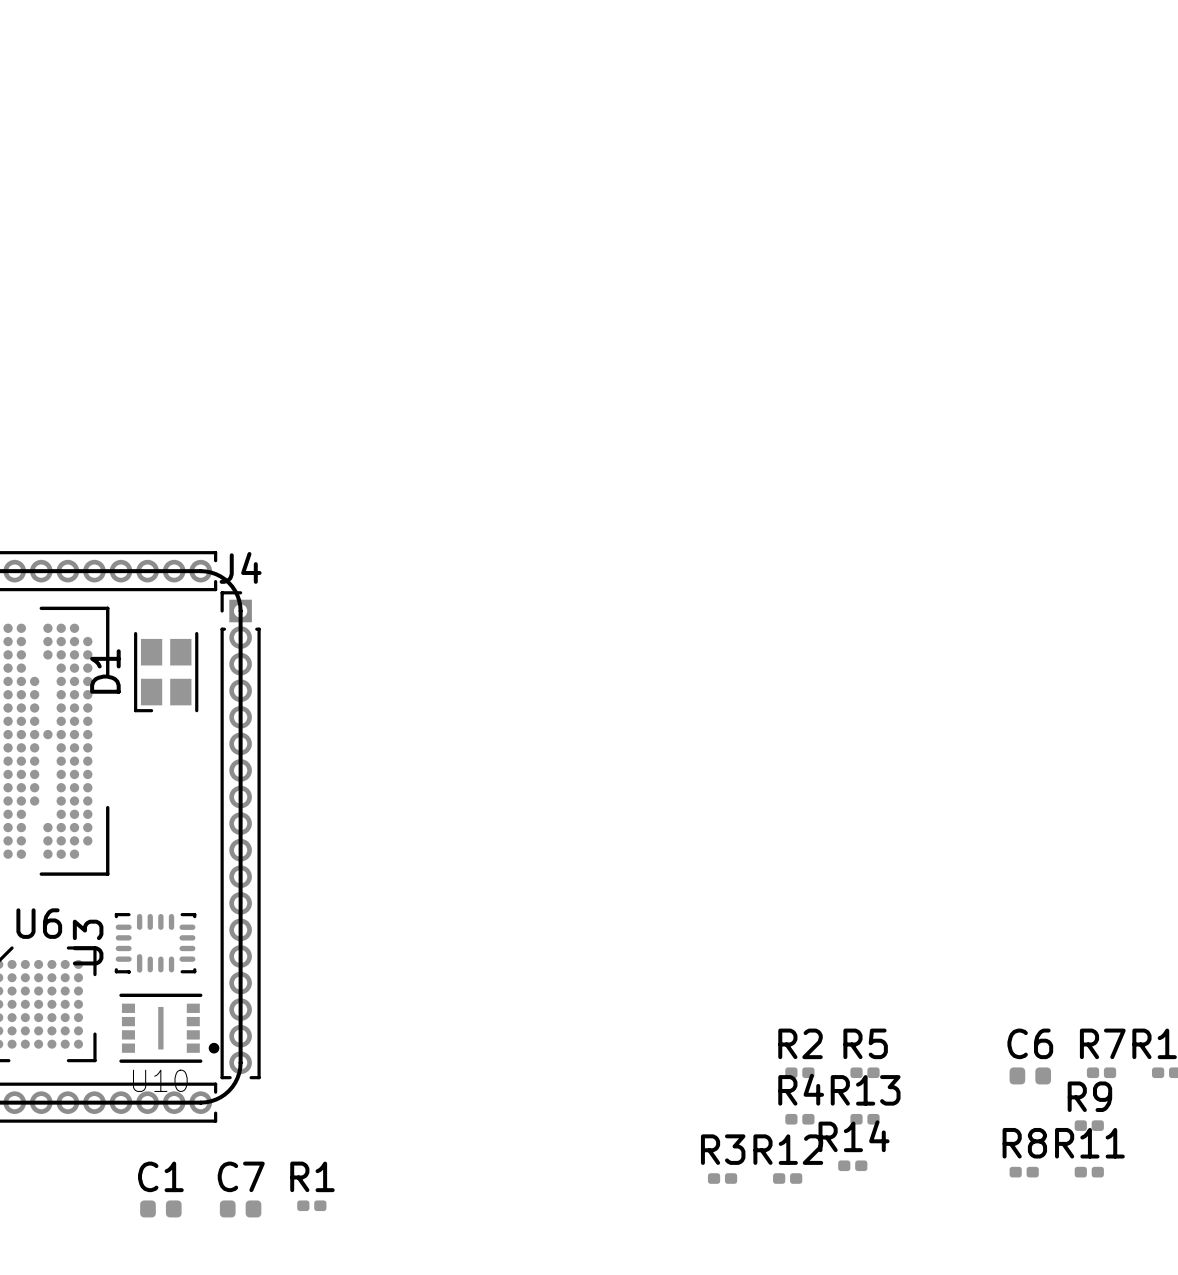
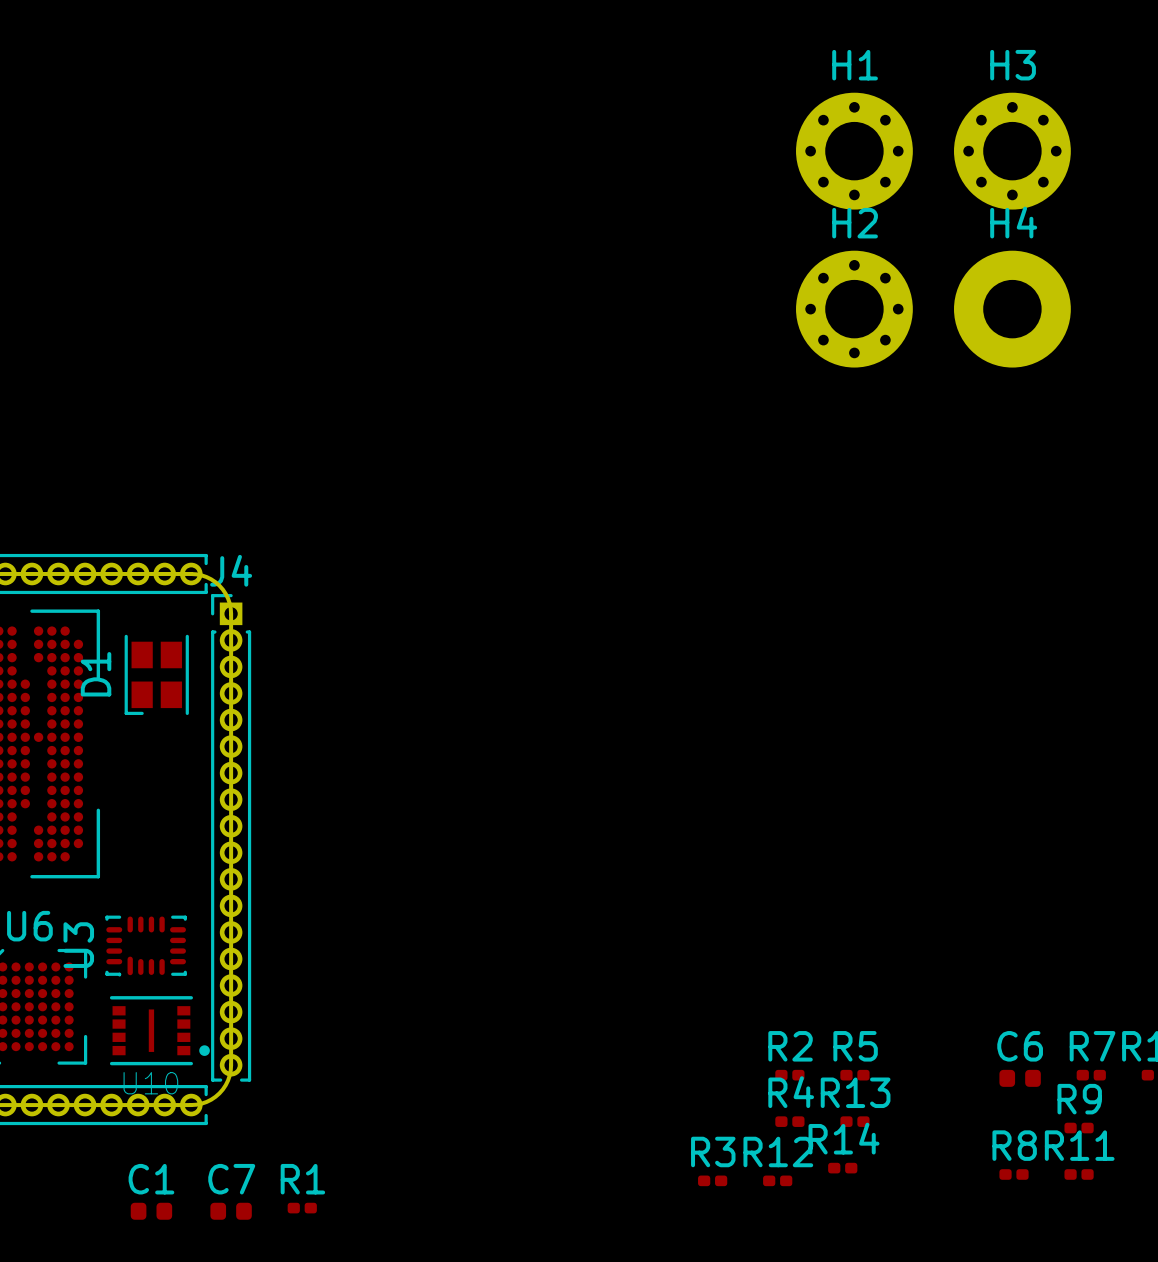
H1: none -> (854, 151)
H3: none -> (1012, 151)
H2: none -> (854, 309)
H4: none -> (1012, 309)

